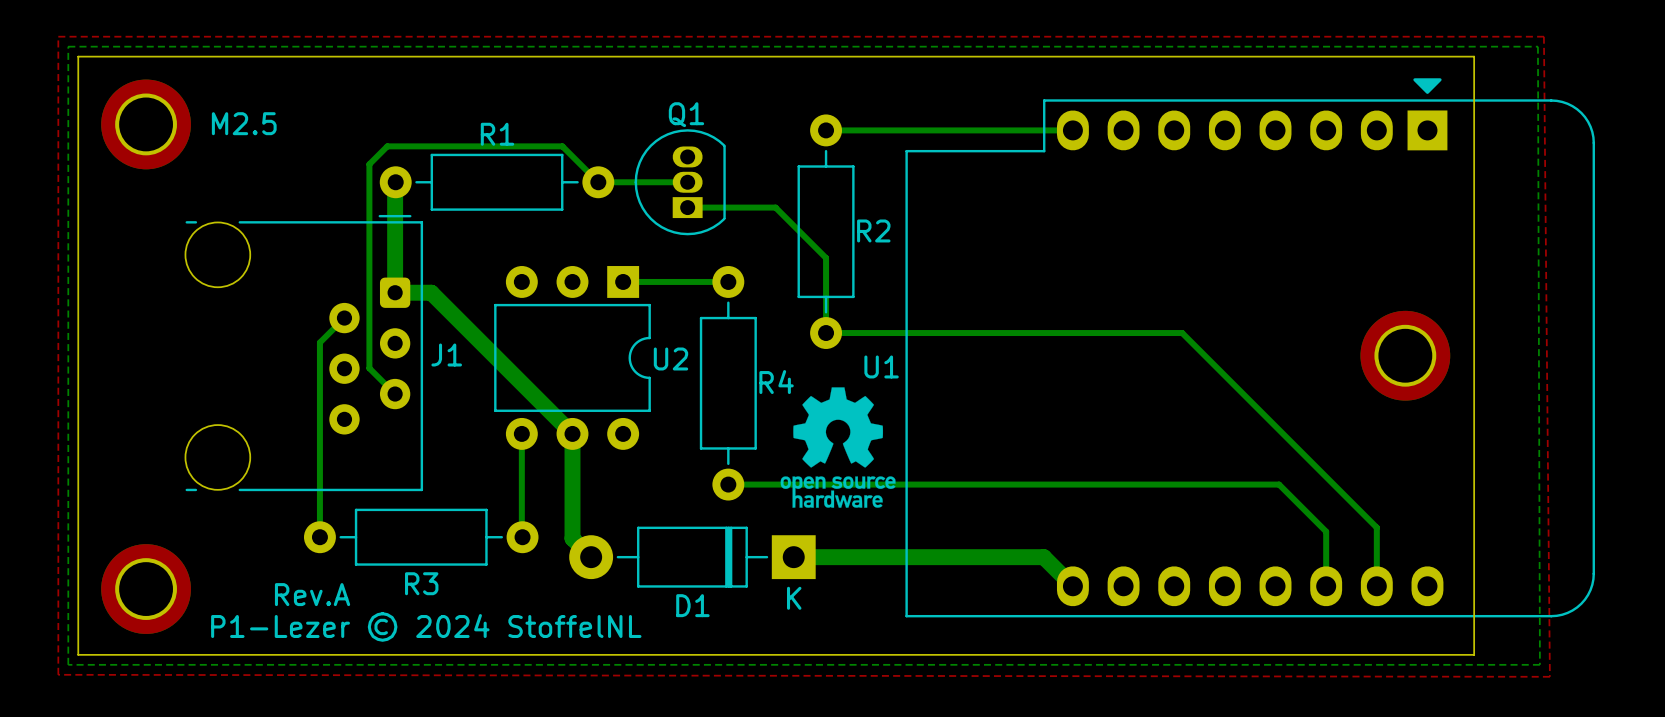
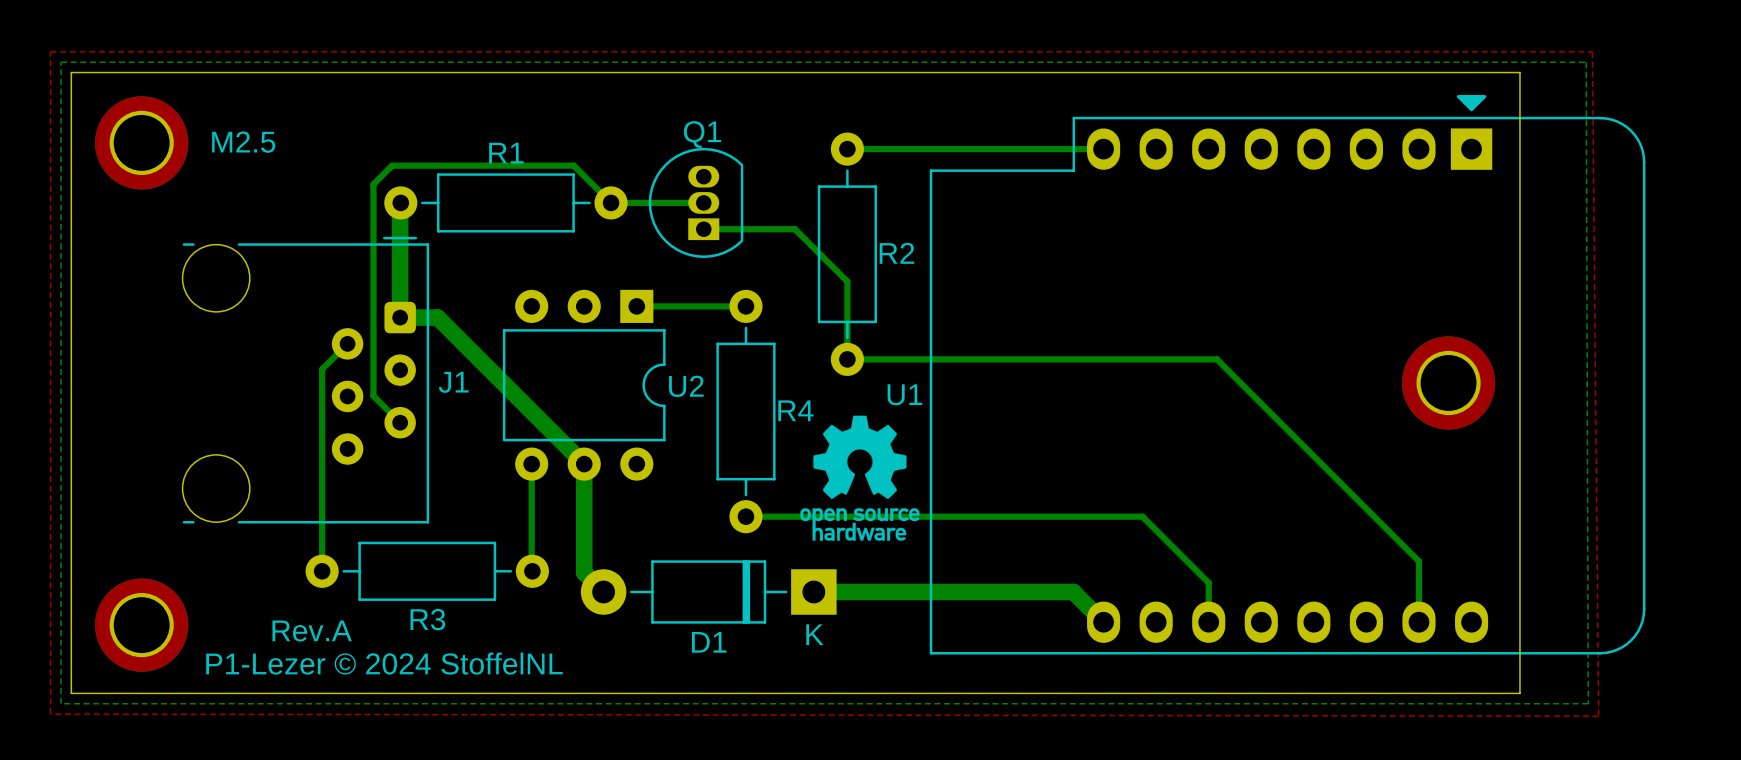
bottom track: (1110, 484) (1279, 484) (1326, 531) (1326, 586) -> (1142, 516) (1208, 582) (1208, 622)

